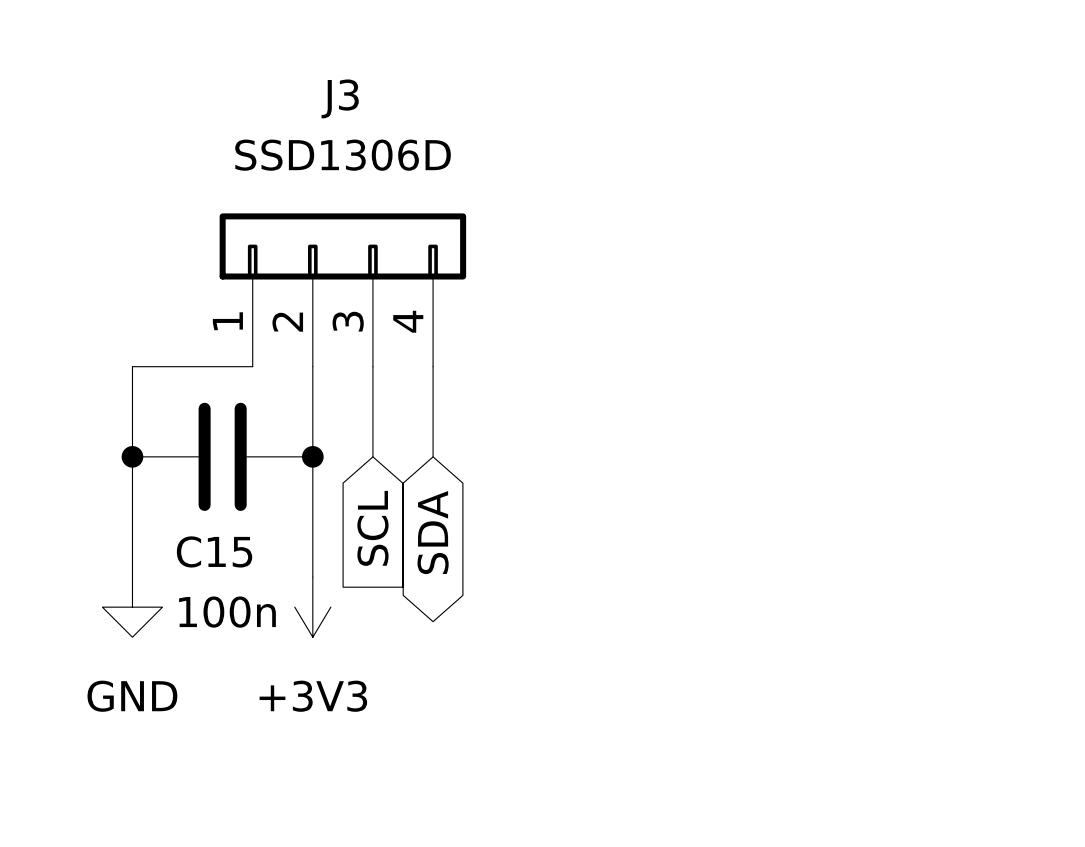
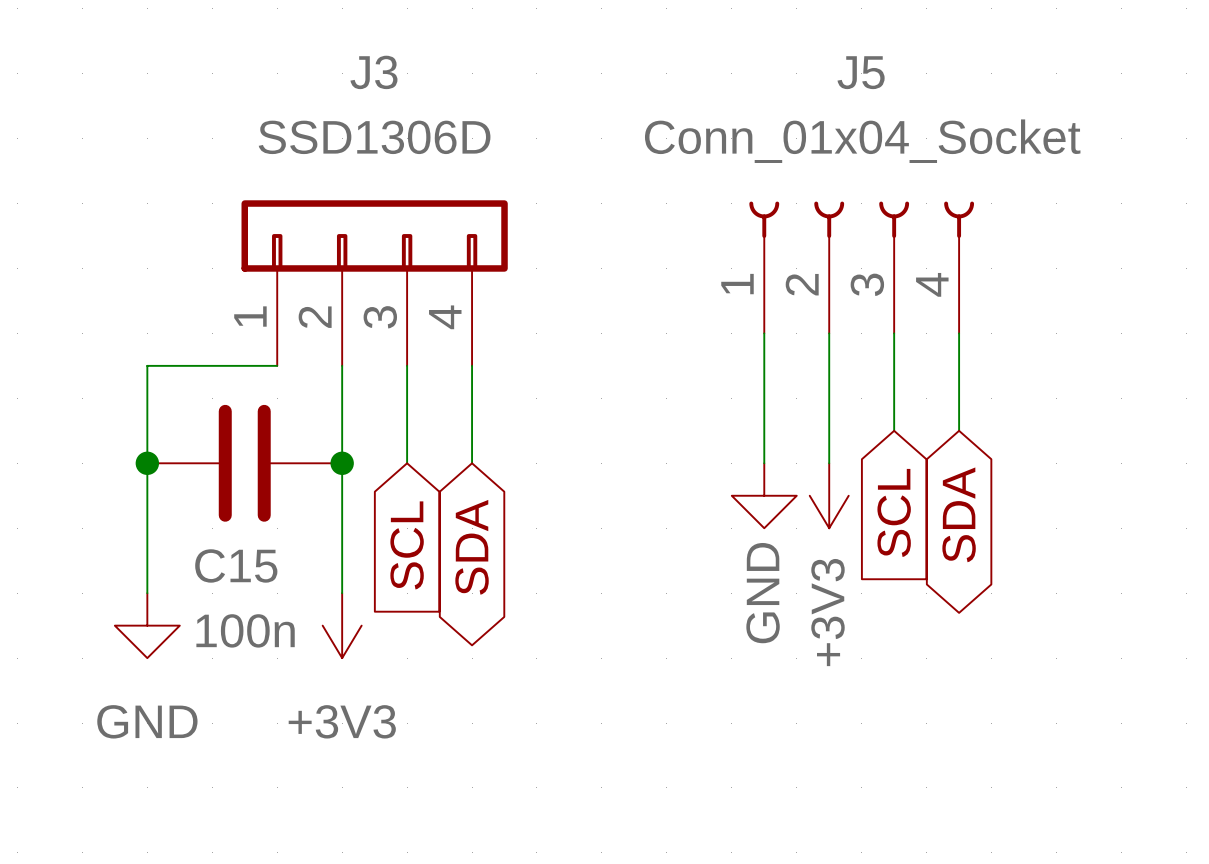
J5: none -> Conn_01x04_Socket (861, 267)
wire: none -> (764, 333) (764, 463)
wire: none -> (829, 333) (829, 463)
wire: none -> (894, 333) (894, 430)
wire: none -> (959, 333) (959, 430)
power symbol: none -> GND (764, 495)
power symbol: none -> +3V3 (829, 495)
global label: none -> SCL (894, 512)
global label: none -> SDA (959, 514)

